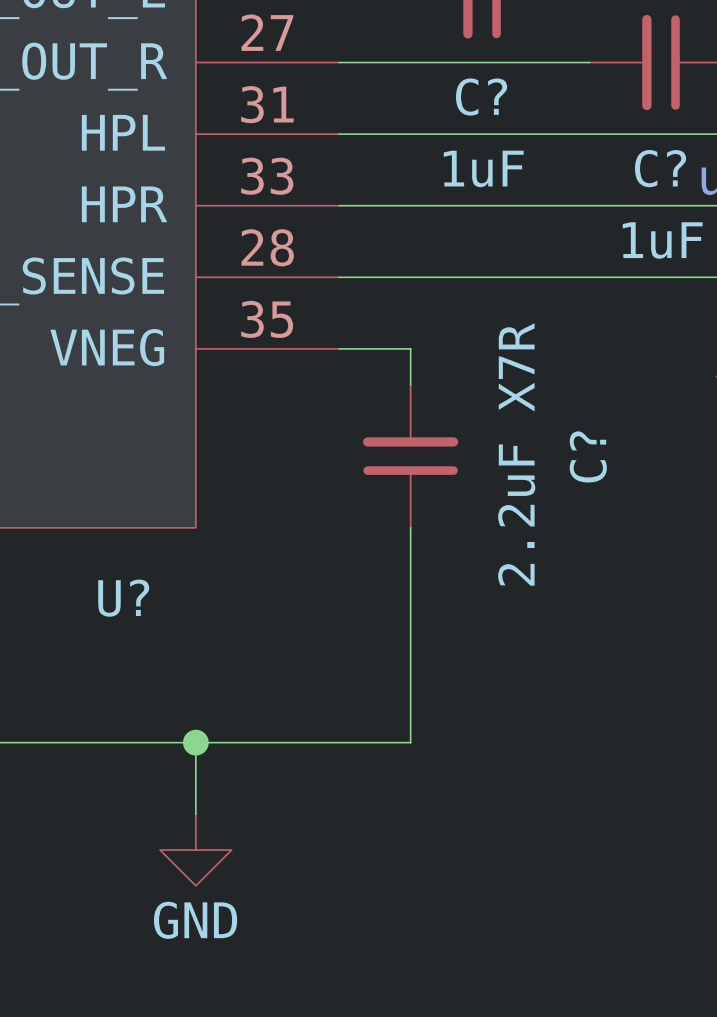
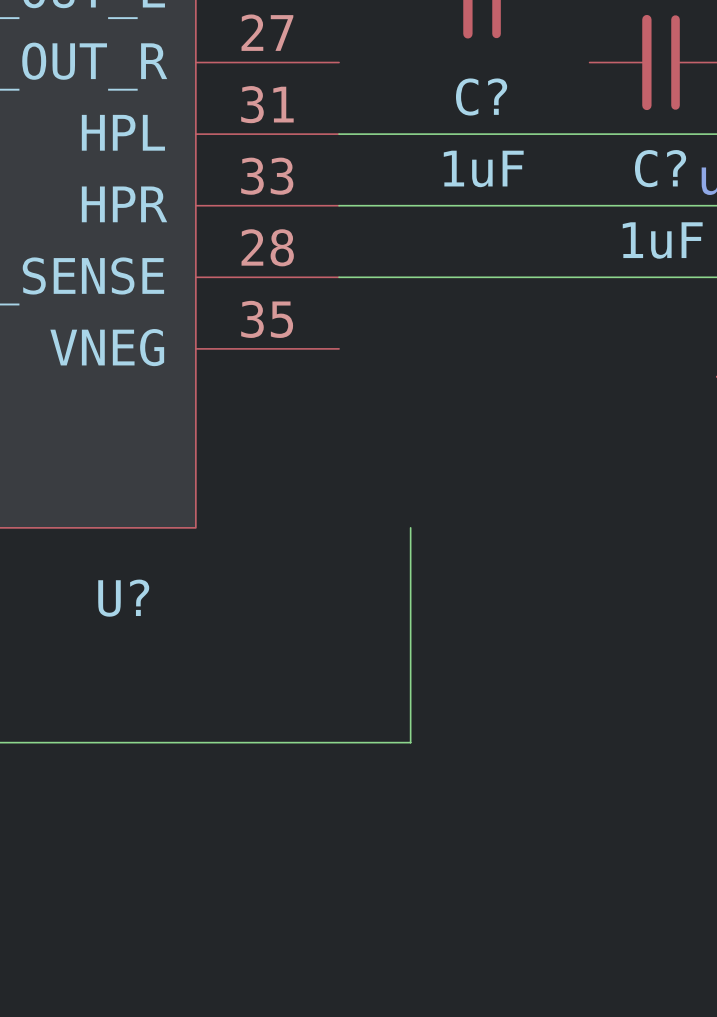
wire: (339, 62) (589, 62) -> none
wire: (339, 348) (410, 348) (410, 384) -> none
C?: 2.2uF X7R (410, 456) -> none
wire: (195, 742) (195, 814) -> none
junction: (195, 742) -> none
power symbol: GND (195, 850) -> none

